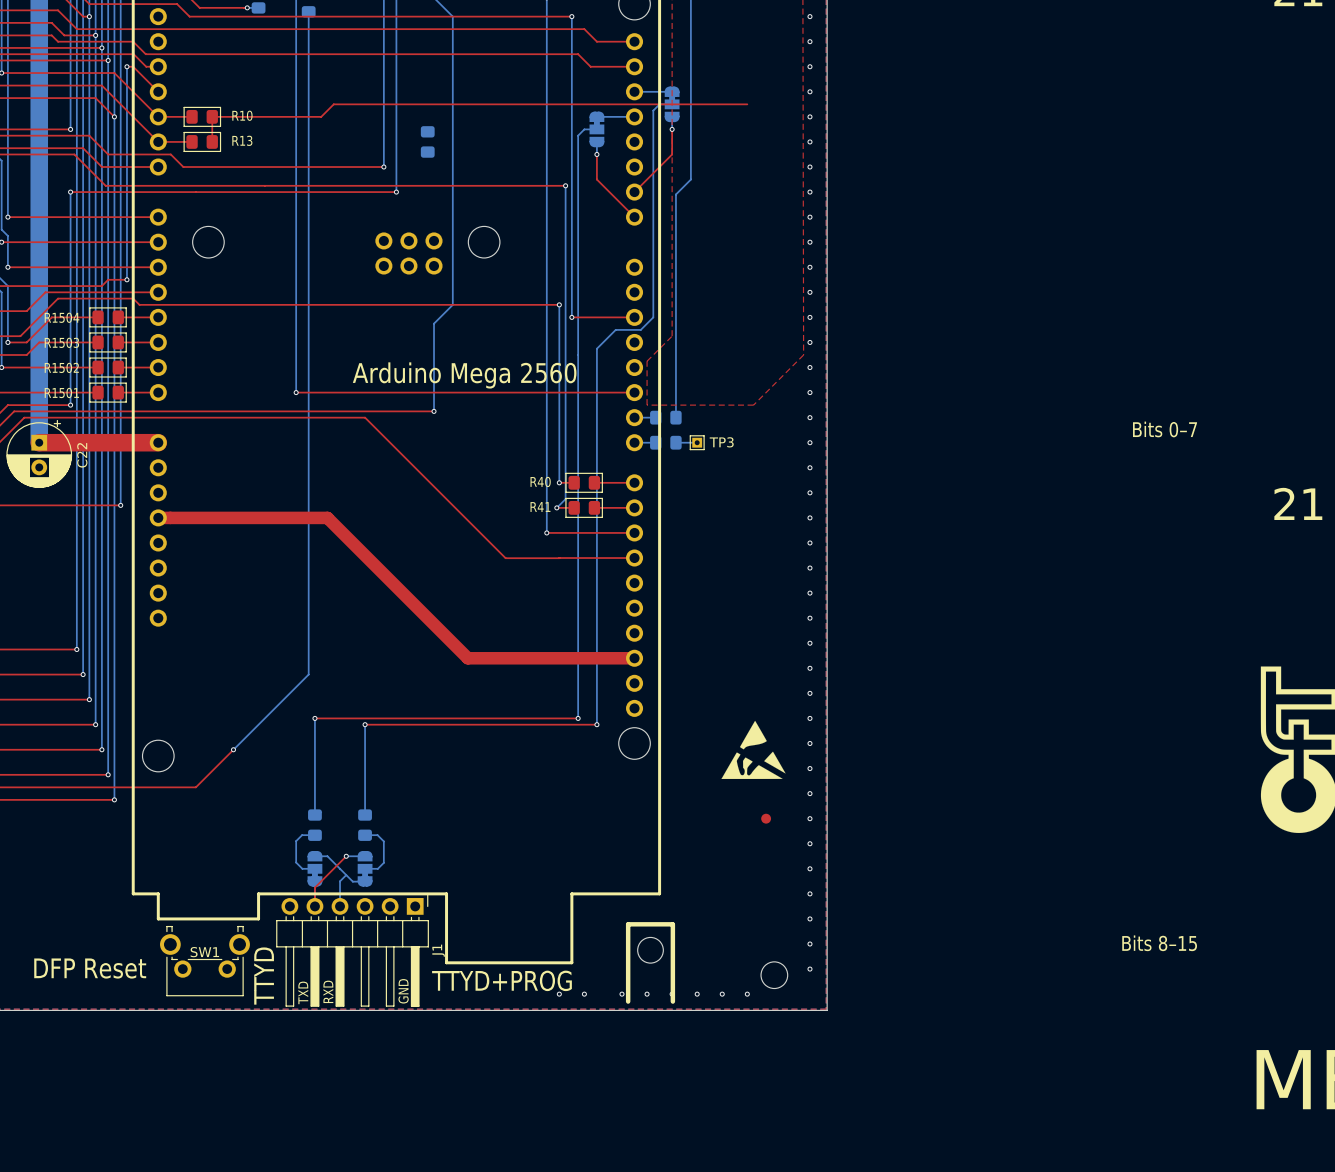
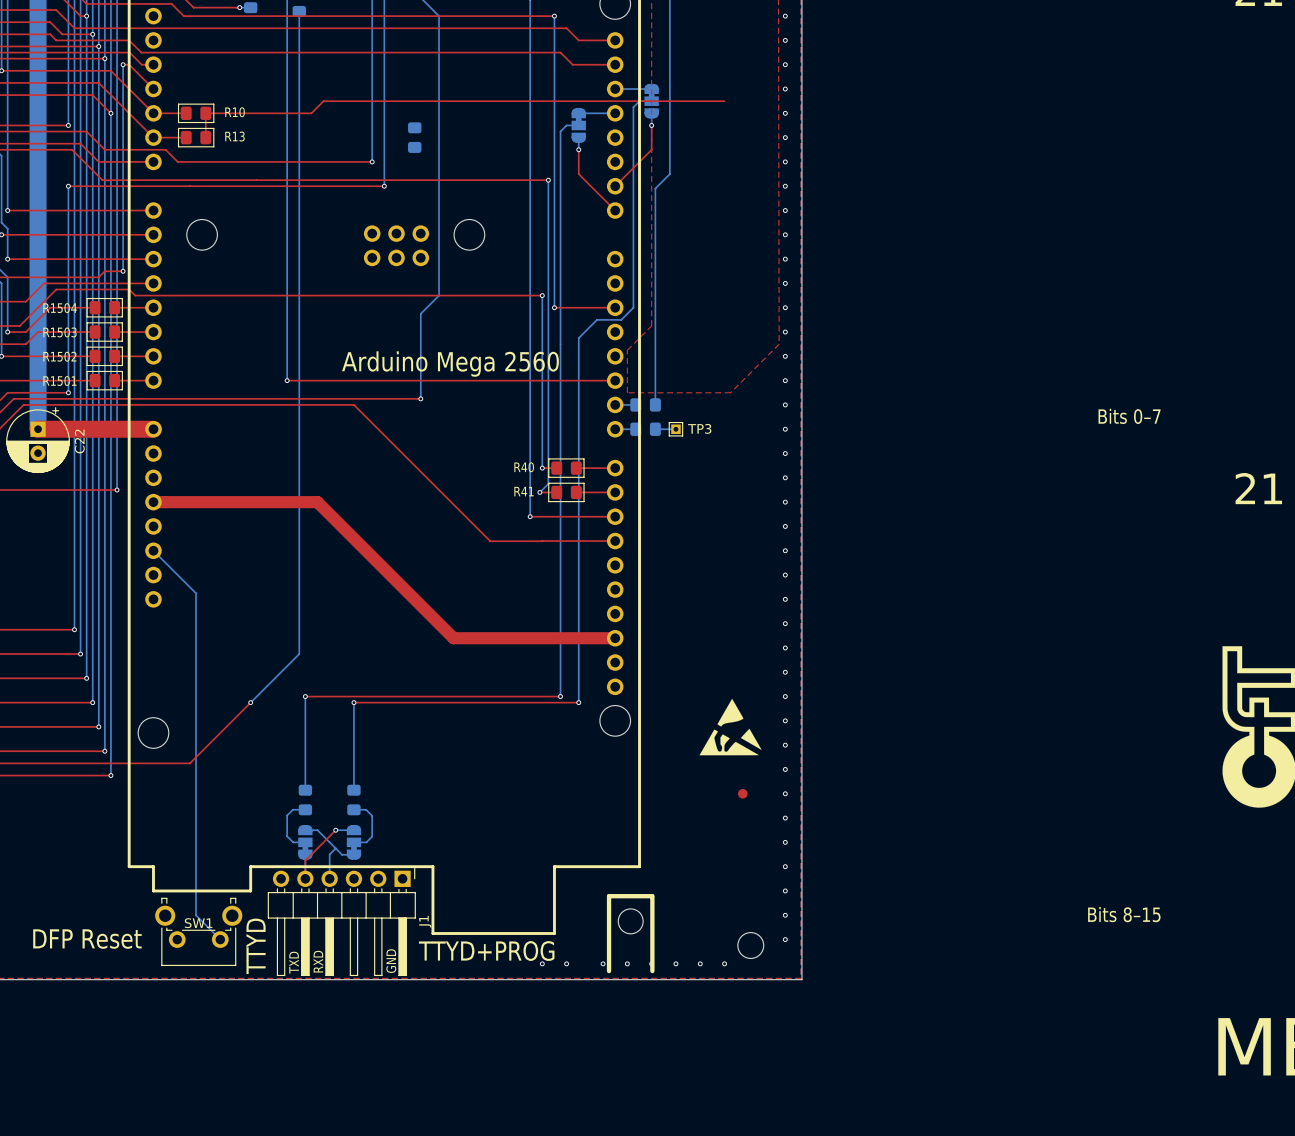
bottom track: none -> (153, 550) (196, 593) (196, 915) (220, 939)
top track: none -> (250, 702) (226, 726)
bottom track: (258, 724) (233, 749) -> none
via position: (233, 749) -> (250, 702)

